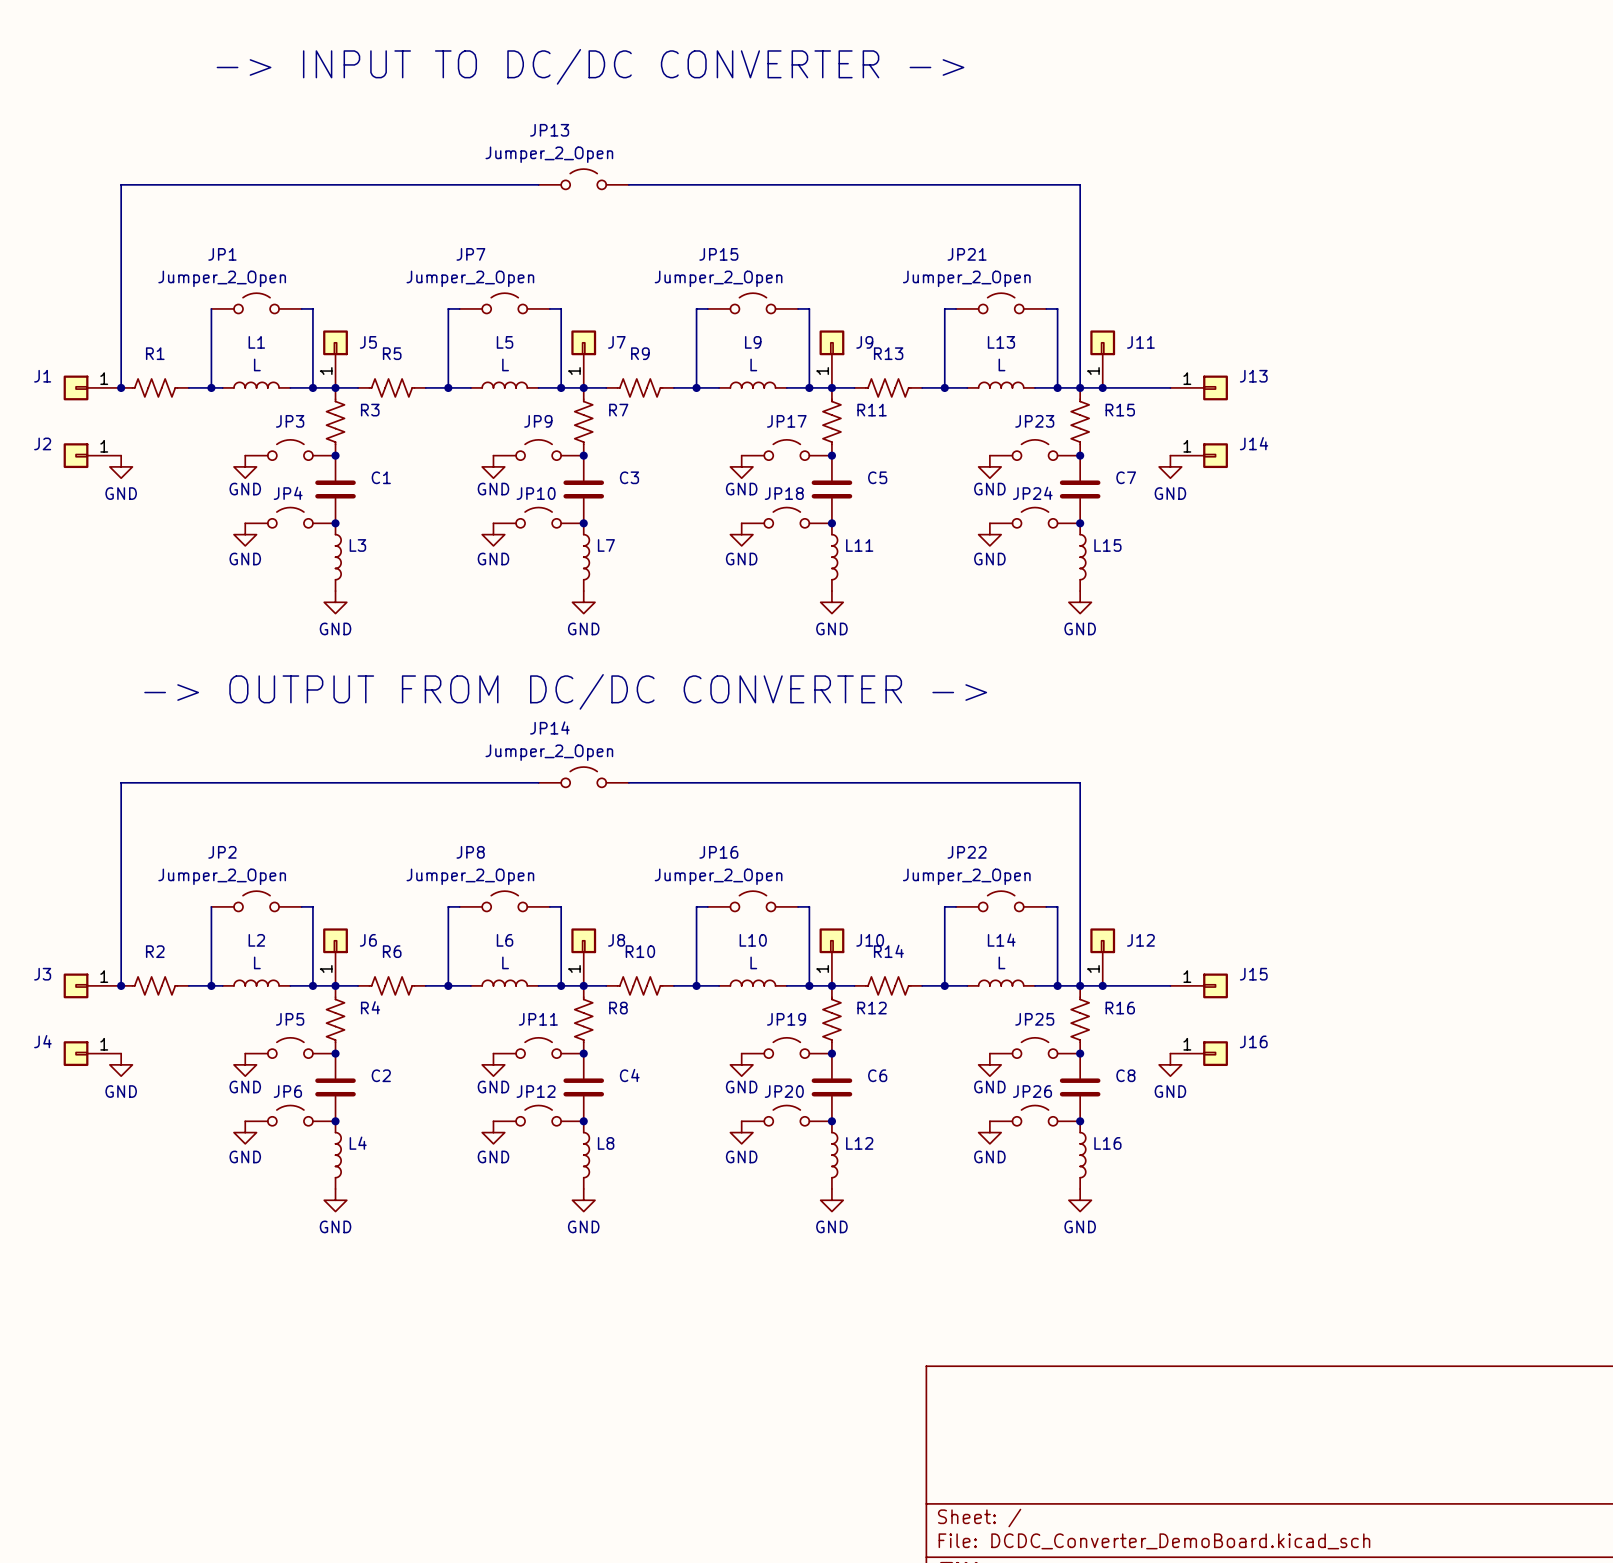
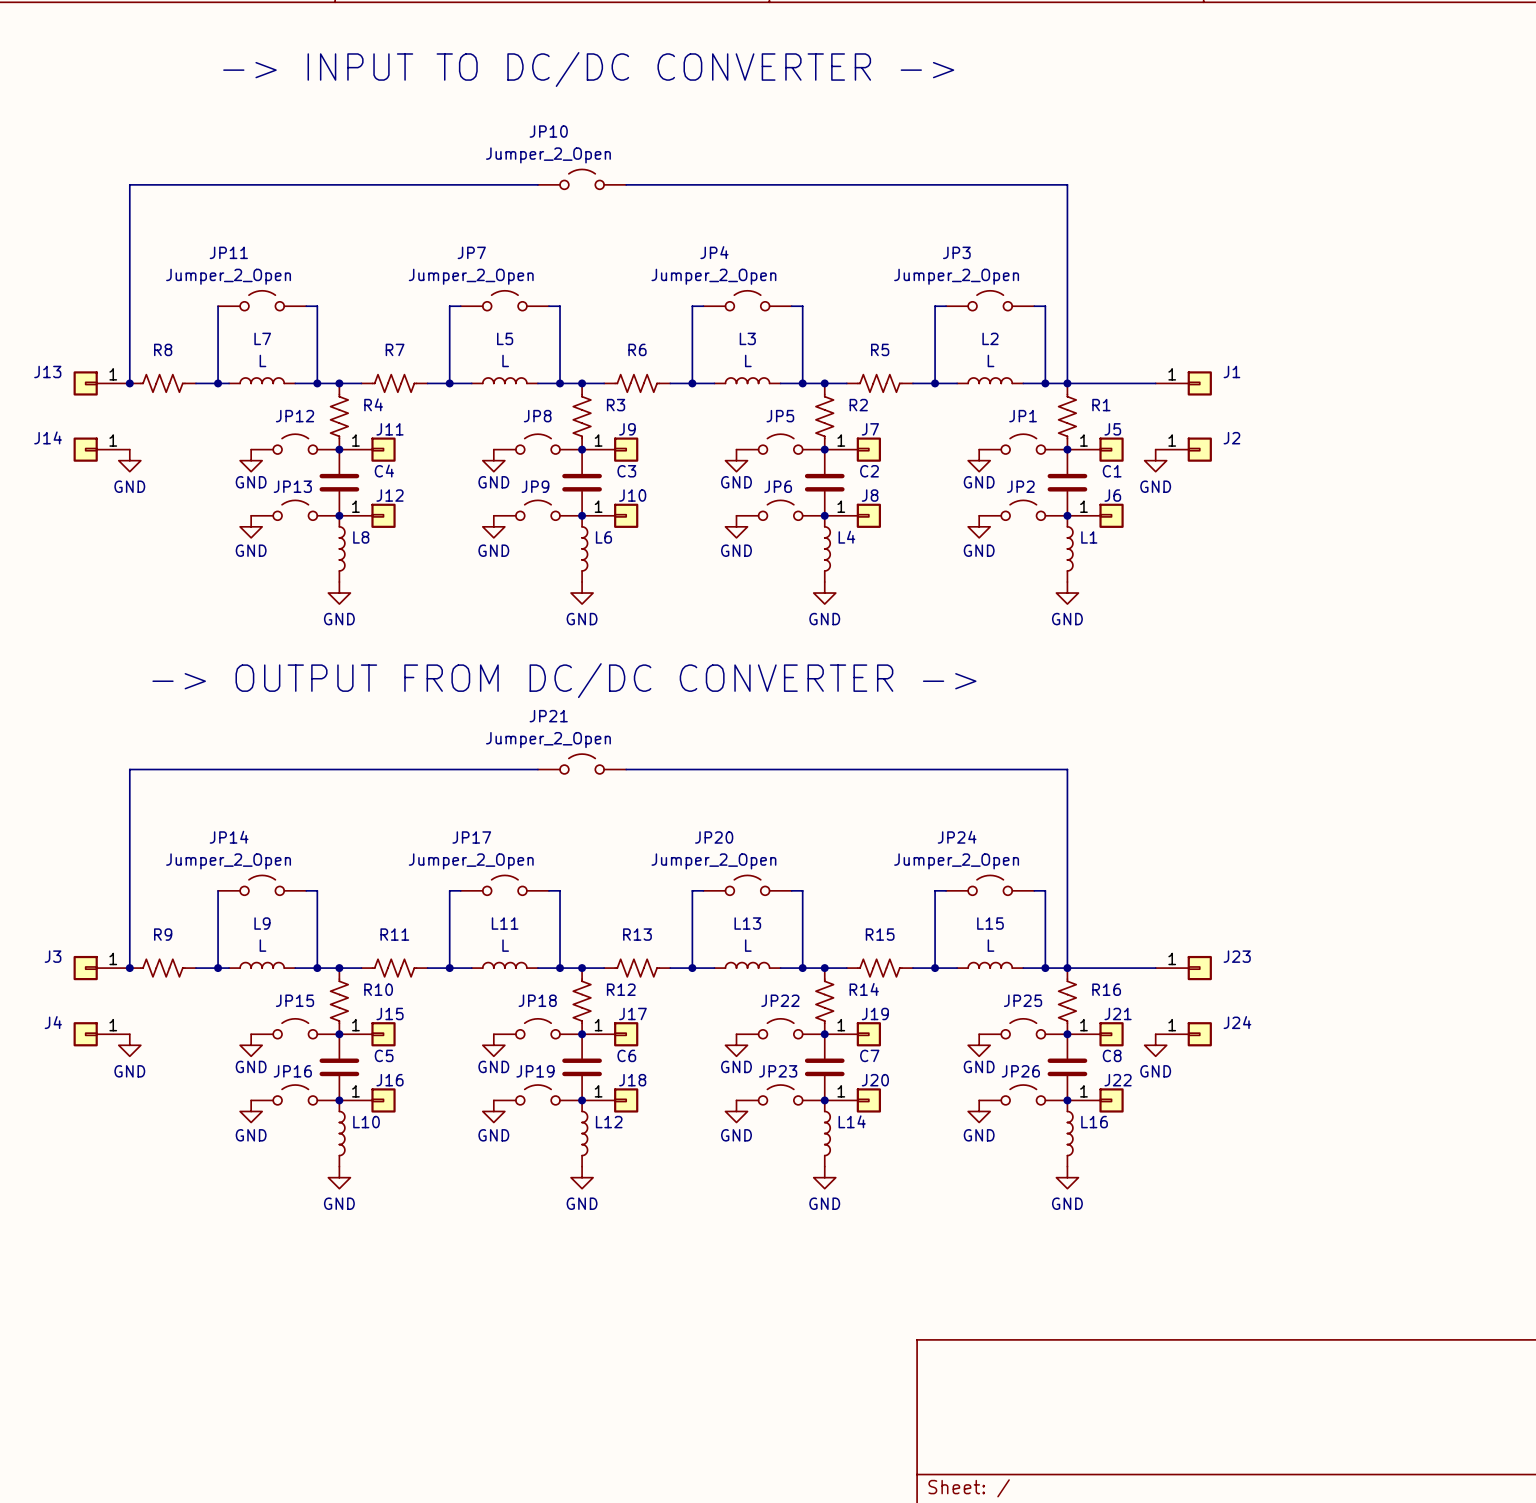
JP13 name: JP13 (549, 130) -> JP10 (548, 131)
JP1 name: JP1 (222, 254) -> JP11 (228, 252)
JP15 name: JP15 (718, 254) -> JP4 (714, 252)
JP21 name: JP21 (967, 254) -> JP3 (956, 252)
L1 name: L1 (256, 342) -> L7 (262, 338)
J5 rotation: 0° (335, 342) -> 90° clockwise (1111, 449)
J7 rotation: 0° (583, 342) -> 90° clockwise (868, 449)
L9 name: L9 (753, 342) -> L3 (747, 338)
J9 rotation: 0° (831, 342) -> 90° clockwise (626, 449)
L13 name: L13 (1001, 342) -> L2 (990, 338)
J11 rotation: 0° (1102, 342) -> 90° clockwise (383, 449)
R1 name: R1 (155, 353) -> R8 (163, 349)
R5 name: R5 (392, 353) -> R7 (395, 349)
R9 name: R9 (640, 353) -> R6 (637, 349)
R13 name: R13 (888, 353) -> R5 (880, 349)
J5 position: (335, 359) -> (1095, 449)
J7 position: (583, 359) -> (852, 449)
J9 position: (831, 359) -> (610, 449)
J11 position: (1102, 359) -> (367, 449)
J1 name: J1 (42, 376) -> J13 (47, 371)
J13 name: J13 (1253, 376) -> J1 (1231, 371)
junction: (1102, 387) -> none
R3 name: R3 (370, 410) -> R4 (373, 404)
R7 name: R7 (618, 410) -> R3 (616, 405)
R11 name: R11 (872, 410) -> R2 (858, 405)
R15 name: R15 (1120, 410) -> R1 (1101, 405)
JP3 name: JP3 (290, 421) -> JP12 (295, 416)
JP9 name: JP9 (538, 421) -> JP8 (537, 416)
JP17 name: JP17 (786, 421) -> JP5 (780, 416)
JP23 name: JP23 (1034, 421) -> JP1 (1023, 416)
J2 name: J2 (42, 443) -> J14 (48, 437)
J14 name: J14 (1254, 443) -> J2 (1231, 438)
C1 name: C1 (381, 477) -> C4 (384, 471)
C5 name: C5 (877, 477) -> C2 (869, 471)
C7 name: C7 (1126, 477) -> C1 (1112, 471)
JP4 name: JP4 (288, 493) -> JP13 (292, 486)
JP10 name: JP10 (536, 493) -> JP9 (535, 486)
JP18 name: JP18 (784, 493) -> JP6 (778, 486)
JP24 name: JP24 (1032, 493) -> JP2 (1020, 486)
L3 name: L3 (357, 545) -> L8 (361, 537)
L7 name: L7 (606, 545) -> L6 (603, 537)
L11 name: L11 (859, 545) -> L4 (846, 537)
L15 name: L15 (1107, 545) -> L1 (1089, 537)
JP14 name: JP14 (549, 727) -> JP21 (548, 716)
JP2 name: JP2 (222, 852) -> JP14 (229, 837)
JP8 name: JP8 (470, 852) -> JP17 (471, 837)
JP16 name: JP16 (718, 852) -> JP20 (714, 837)
JP22 name: JP22 (967, 852) -> JP24 (957, 837)
L2 name: L2 (256, 940) -> L9 (262, 923)
J6 rotation: 0° (335, 940) -> 90° clockwise (1111, 515)
L6 name: L6 (505, 940) -> L11 (505, 923)
J8 rotation: 0° (583, 940) -> 90° clockwise (868, 515)
L10 name: L10 (753, 940) -> L13 (747, 923)
J10 rotation: 0° (831, 940) -> 90° clockwise (626, 515)
L14 name: L14 (1001, 940) -> L15 (990, 923)
J12 rotation: 0° (1102, 940) -> 90° clockwise (383, 515)
R2 name: R2 (155, 951) -> R9 (163, 934)
R6 name: R6 (392, 951) -> R11 (394, 934)
R10 name: R10 (640, 951) -> R13 (637, 934)
R14 name: R14 (888, 951) -> R15 (880, 934)
J6 position: (335, 957) -> (1095, 515)
J8 position: (583, 957) -> (852, 515)
J10 position: (831, 957) -> (610, 515)
J12 position: (1102, 957) -> (367, 515)
J15 name: J15 (1253, 974) -> J23 (1237, 956)
junction: (1102, 985) -> none
R4 name: R4 (370, 1007) -> R10 (378, 989)
R8 name: R8 (618, 1008) -> R12 (621, 989)
R12 name: R12 (872, 1008) -> R14 (864, 989)
JP5 name: JP5 (290, 1019) -> JP15 (295, 1000)
JP11 name: JP11 (538, 1019) -> JP18 (537, 1000)
JP19 name: JP19 (786, 1019) -> JP22 (780, 1000)
J16 name: J16 (1253, 1041) -> J24 (1237, 1022)
J15: none -> (367, 1034)
J17: none -> (610, 1034)
J19: none -> (852, 1034)
J21: none -> (1095, 1034)
C2 name: C2 (381, 1075) -> C5 (384, 1055)
C4 name: C4 (629, 1075) -> C6 (626, 1055)
C6 name: C6 (877, 1075) -> C7 (869, 1055)
JP6 name: JP6 (287, 1091) -> JP16 (292, 1071)
JP12 name: JP12 (536, 1091) -> JP19 (535, 1071)
JP20 name: JP20 (784, 1091) -> JP23 (778, 1071)
J16: none -> (367, 1100)
J18: none -> (610, 1100)
J20: none -> (852, 1100)
J22: none -> (1095, 1100)
L4 name: L4 (358, 1143) -> L10 (366, 1122)
L8 name: L8 (606, 1143) -> L12 (609, 1122)
L12 name: L12 (859, 1143) -> L14 (852, 1121)

